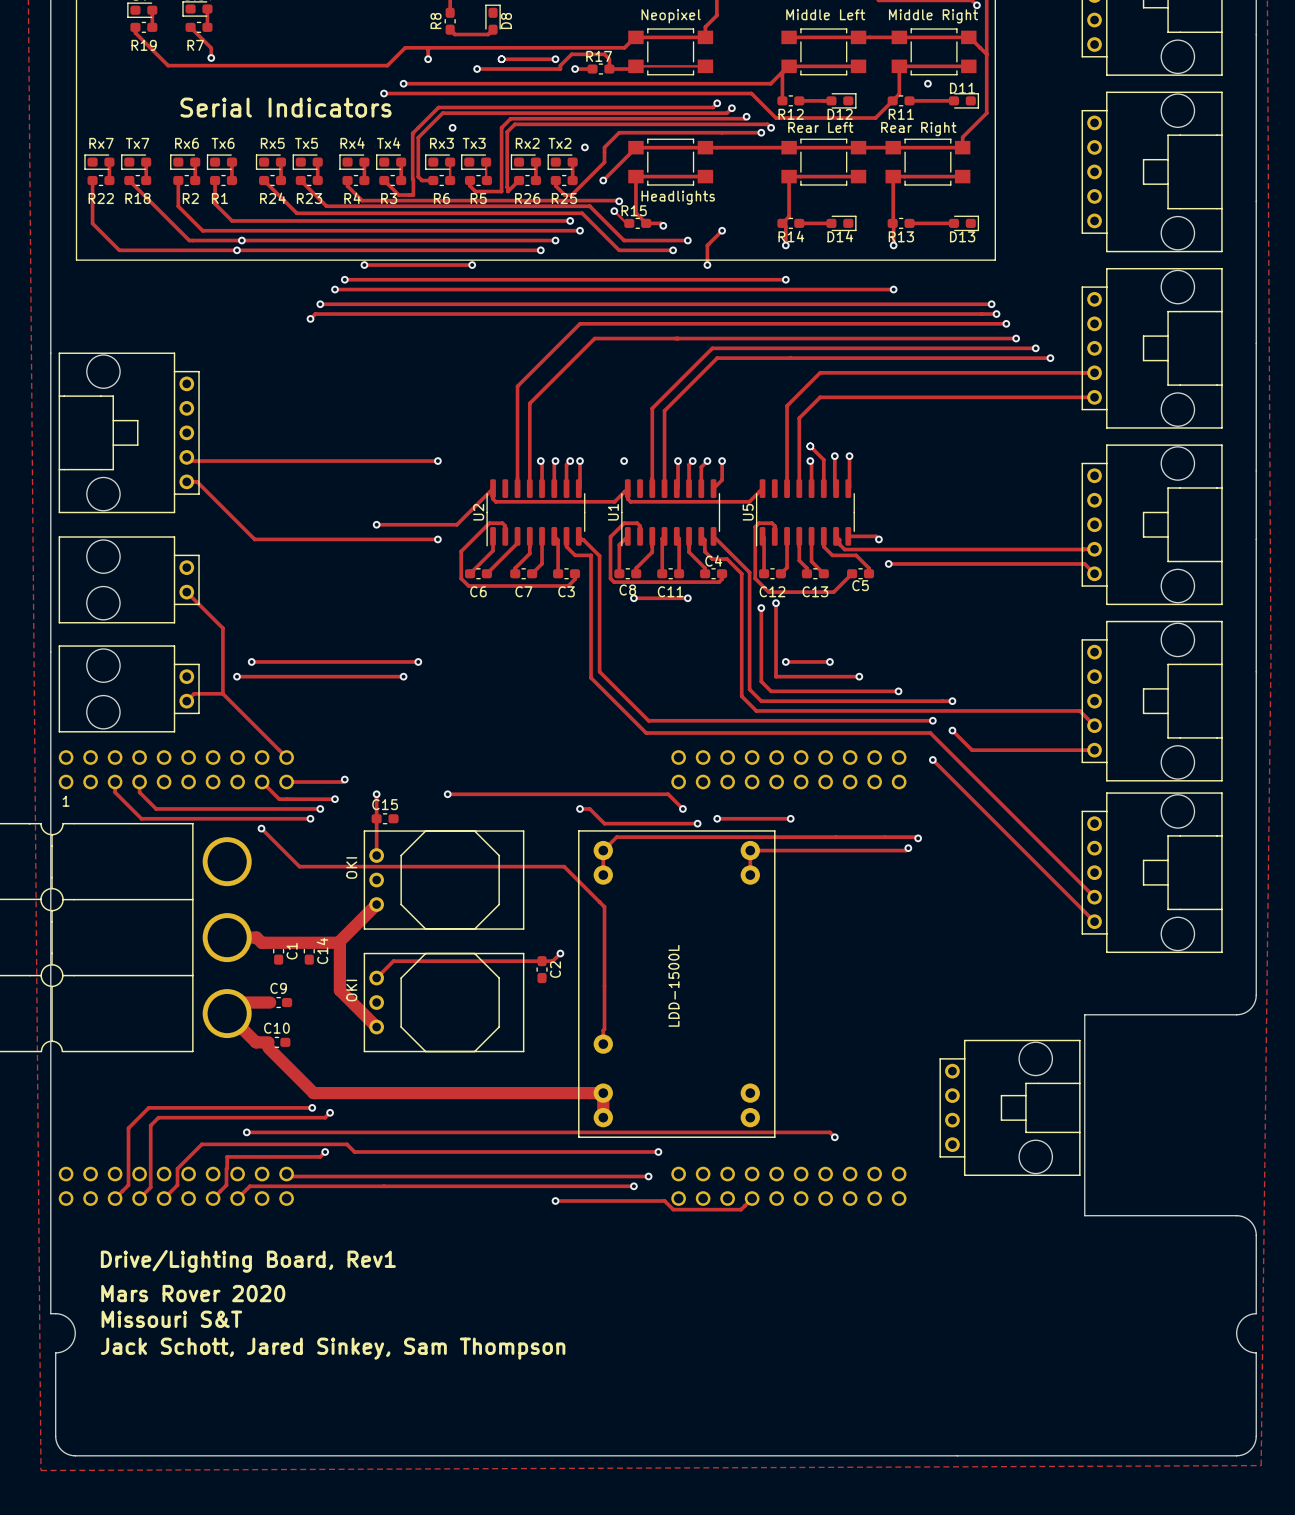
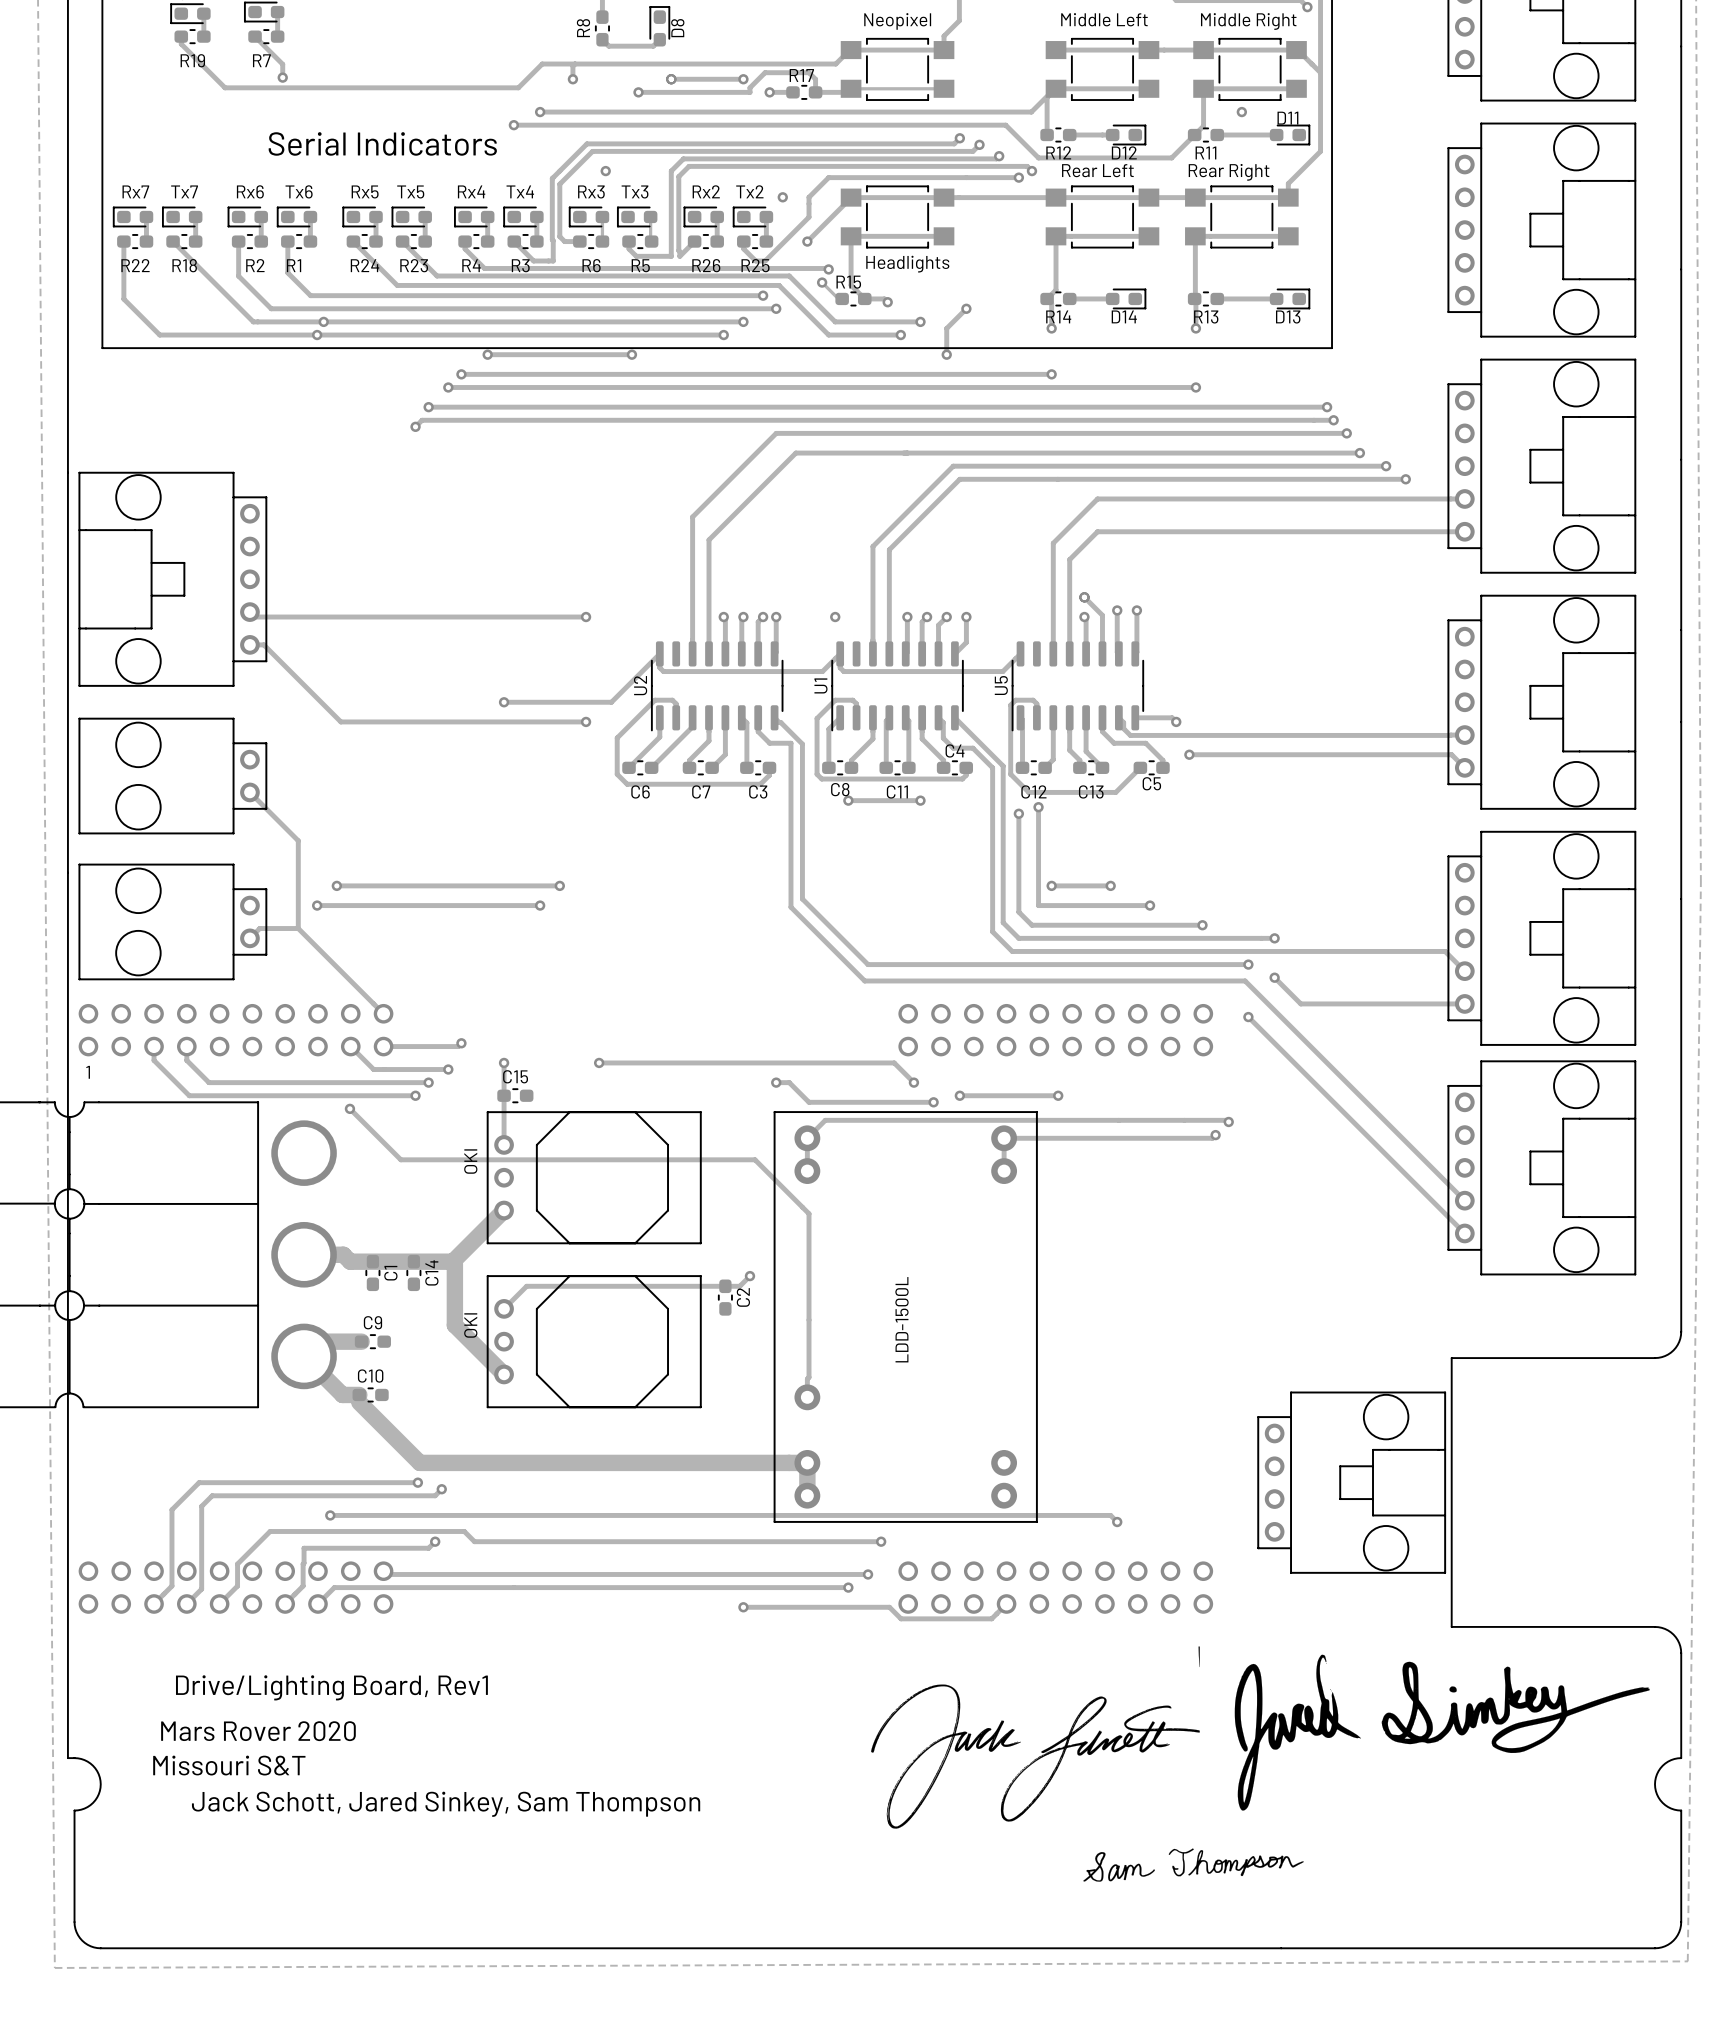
drawing: none -> [871, 1646, 1200, 1829]
drawing: none -> [1234, 1654, 1650, 1811]
drawing: none -> [1083, 1848, 1304, 1882]

